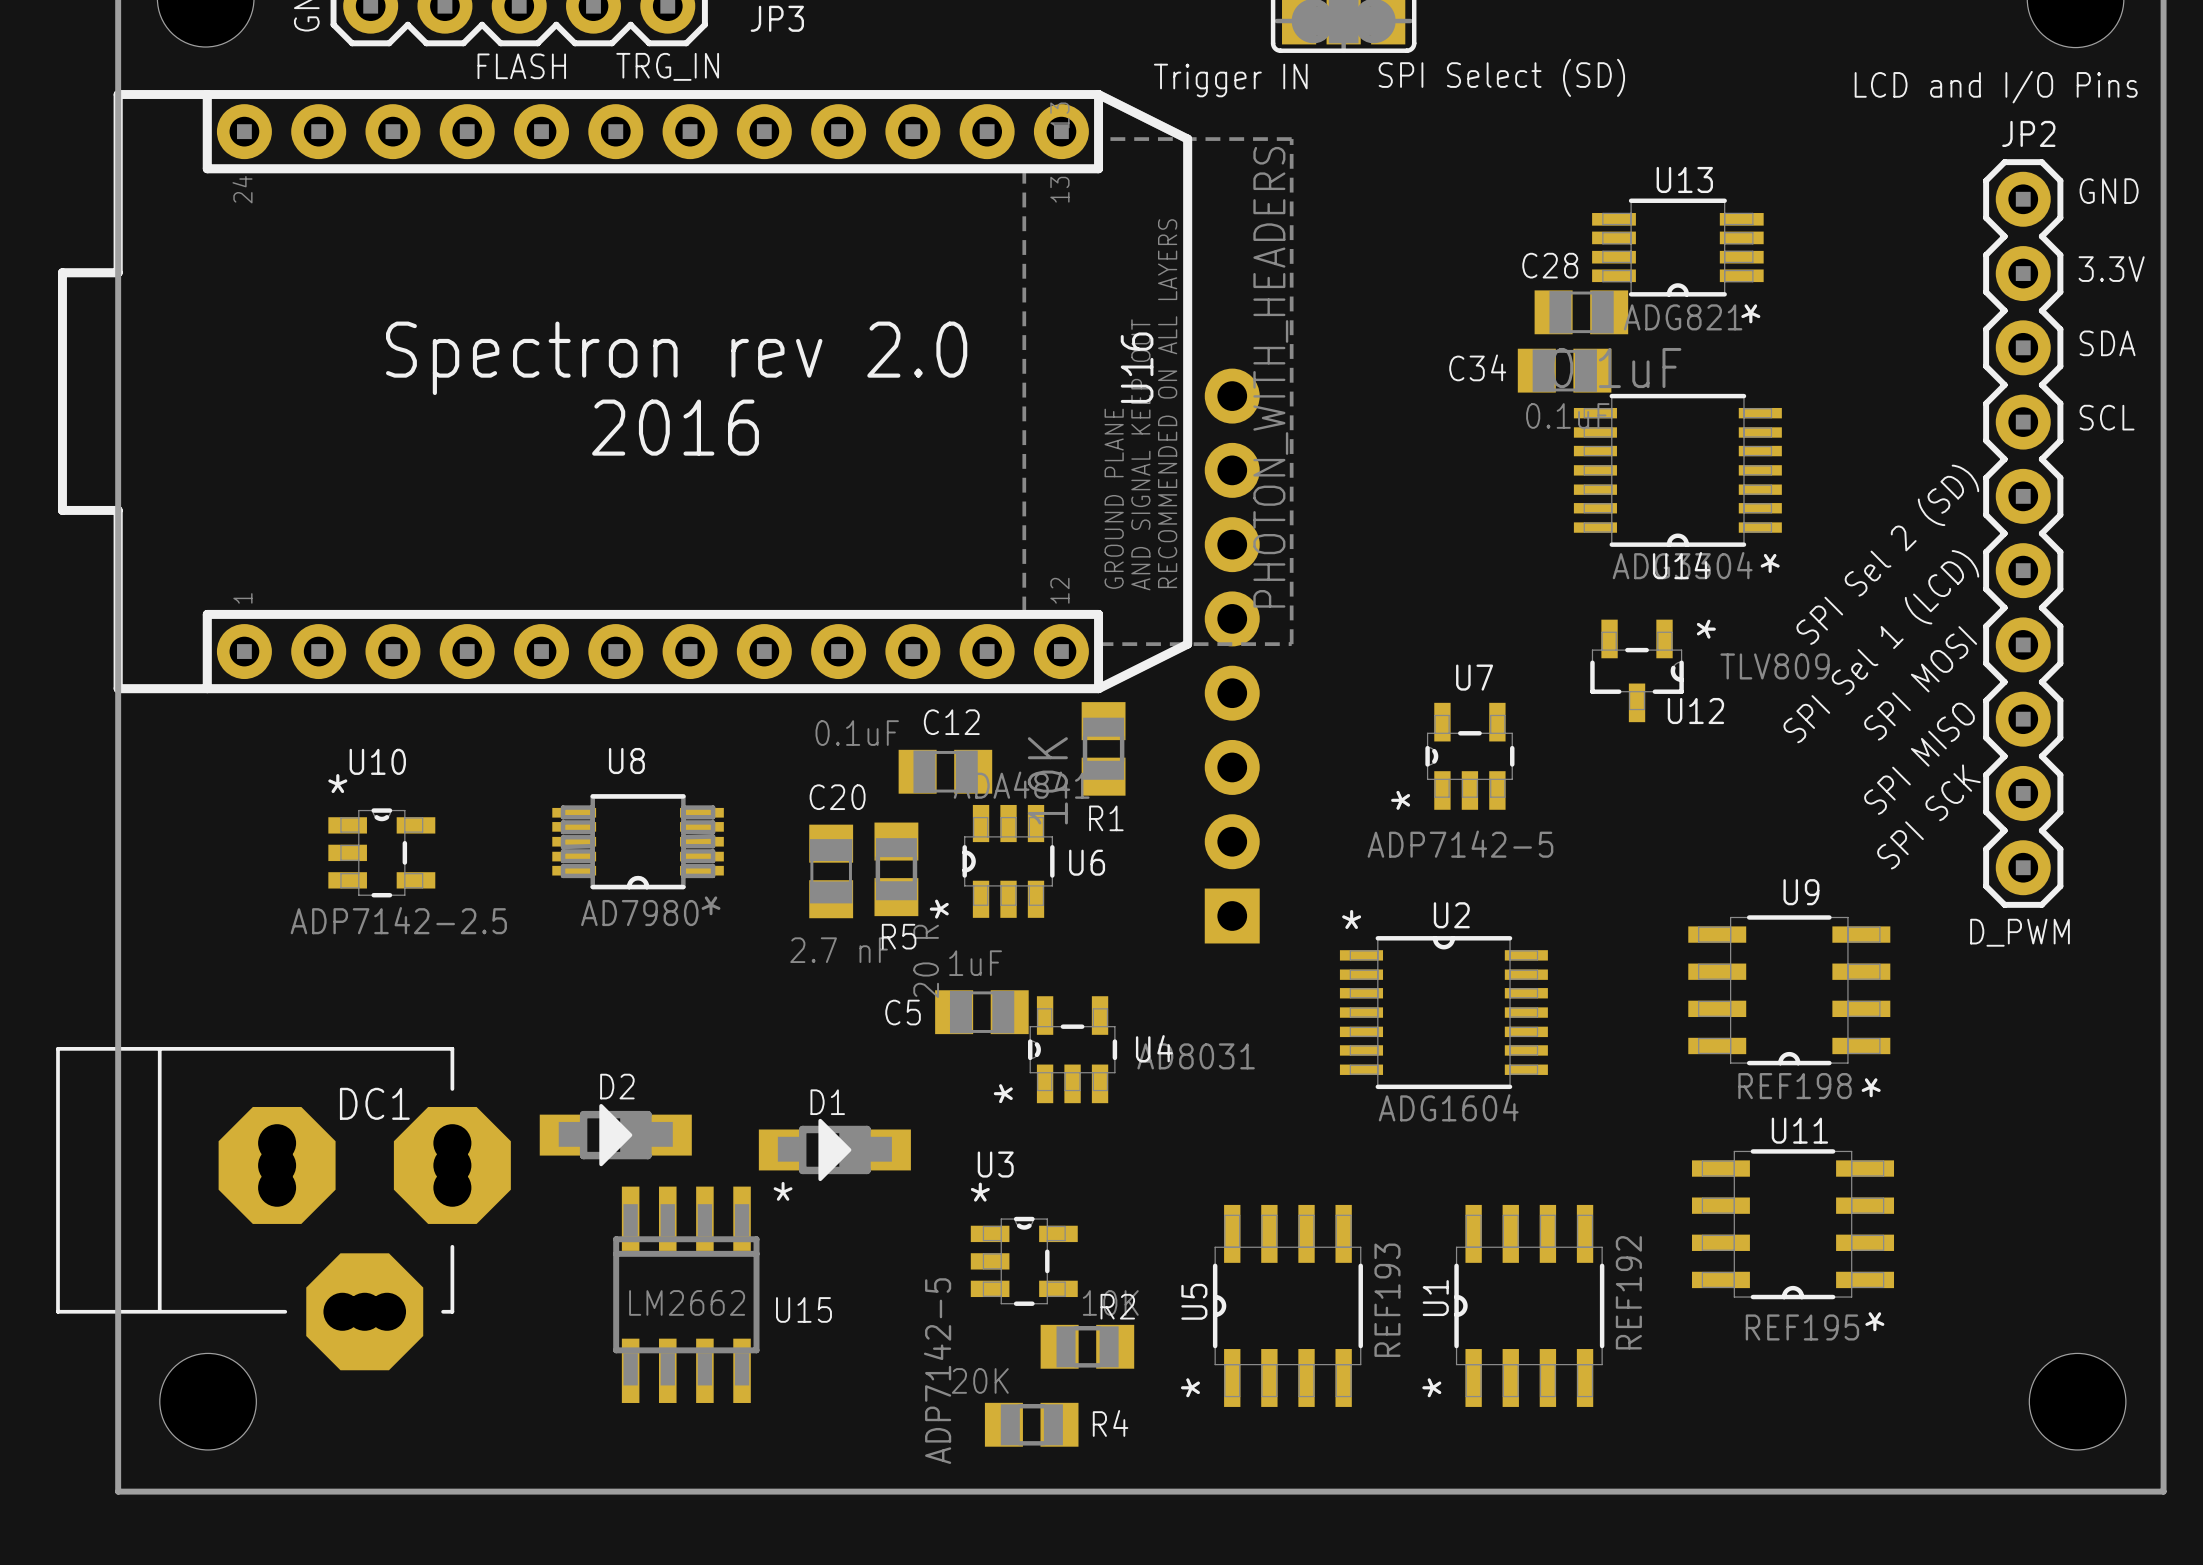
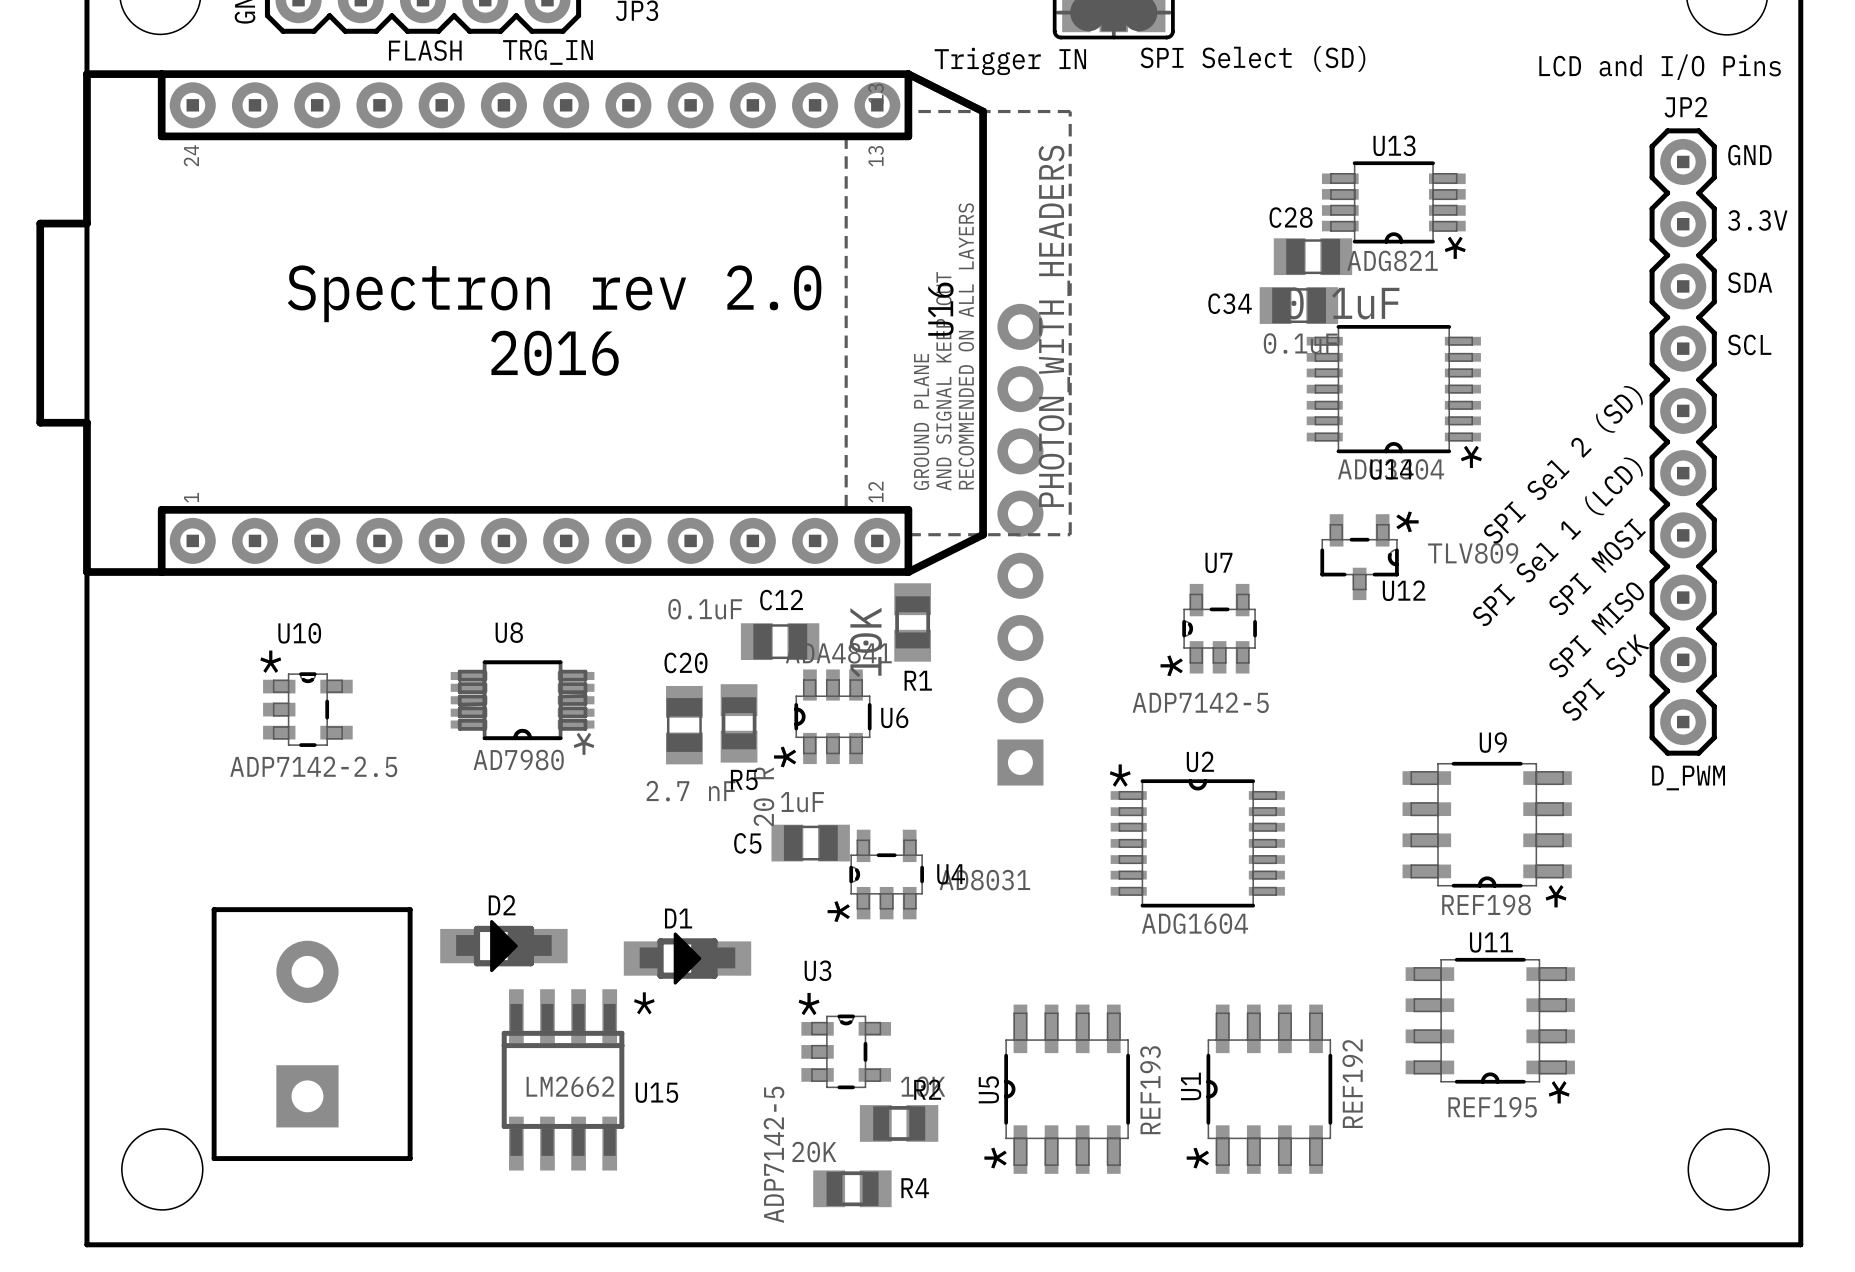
DC1: (283, 1208) -> none
part: none -> (312, 1034)

